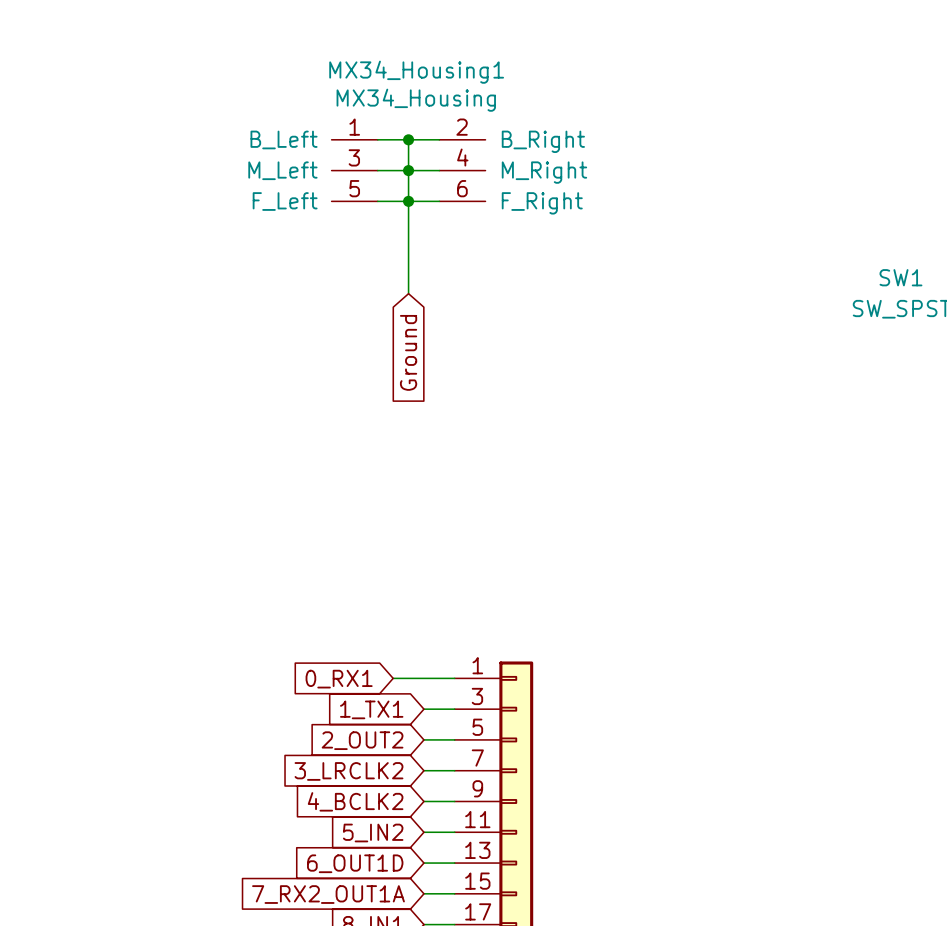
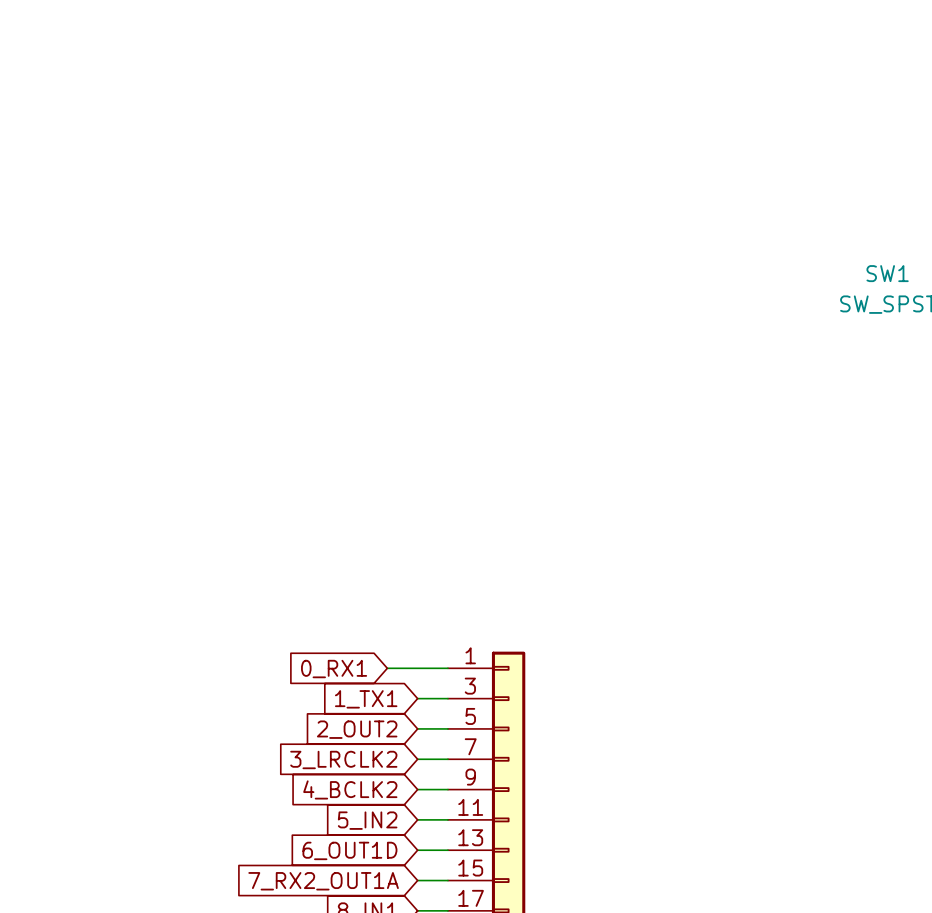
wire: (377, 139) (439, 139) -> none
wire: (408, 139) (408, 293) -> none
junction: (408, 139) -> none
wire: (377, 170) (439, 170) -> none
MX34_Housing1: MX34_Housing (408, 170) -> none
junction: (408, 170) -> none
wire: (377, 201) (439, 201) -> none
junction: (408, 201) -> none
global label: Ground (408, 352) -> none

